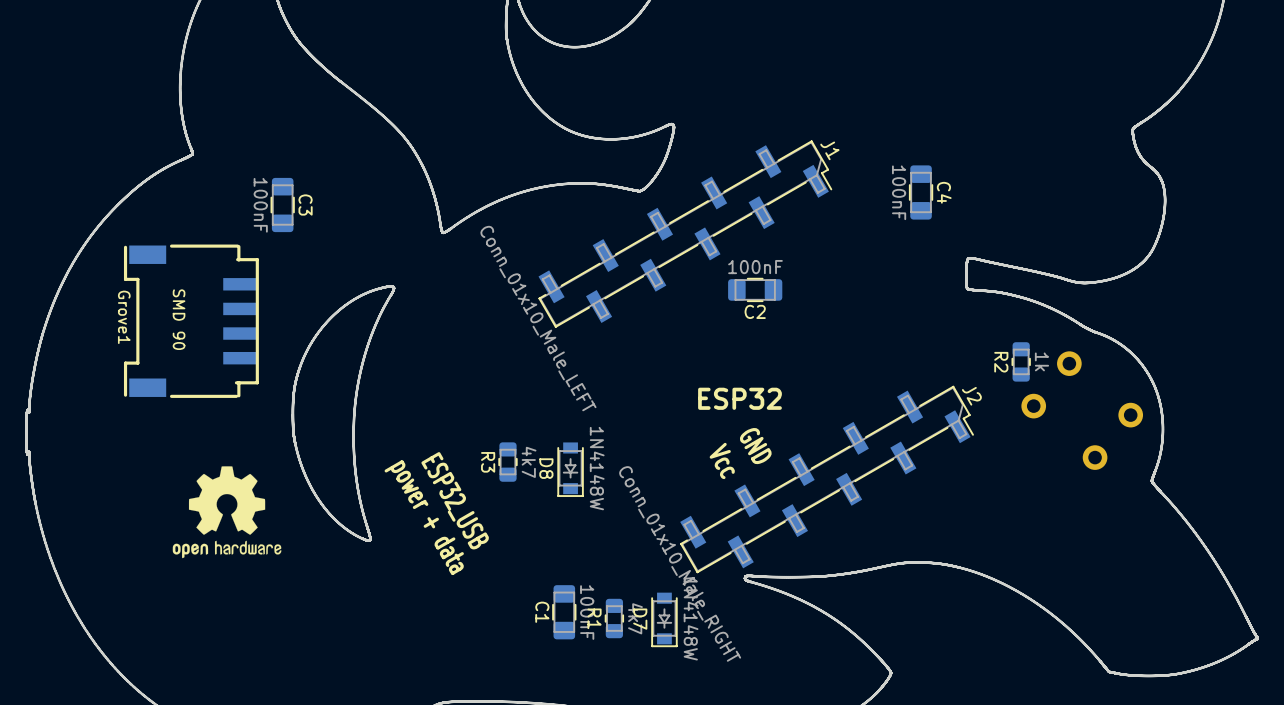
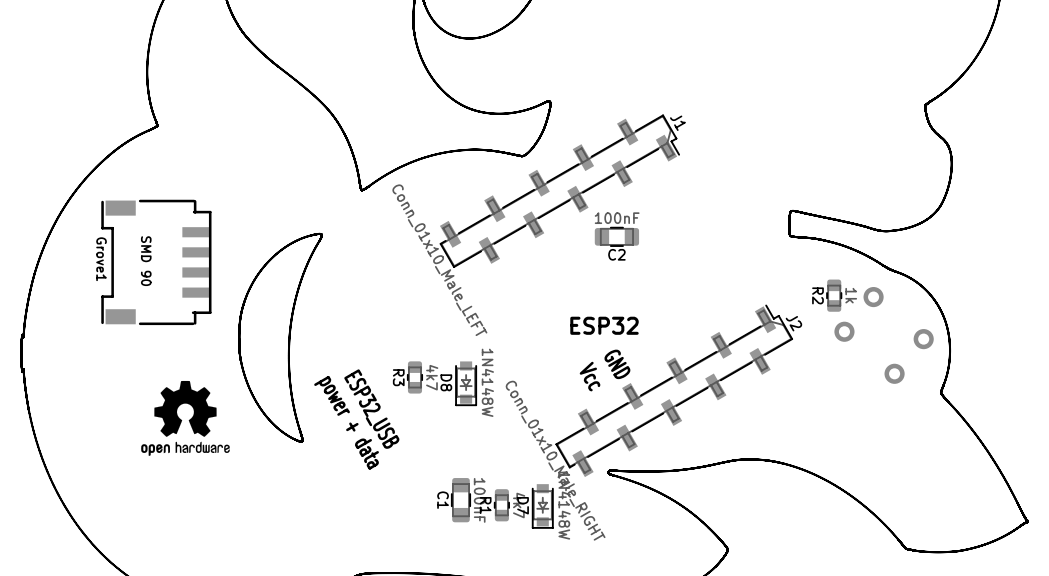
C4: 100nF (921, 192) -> none
C3: 100nF (282, 205) -> none
J2 footprint: [680, 385, 974, 574] -> [555, 304, 793, 478]

